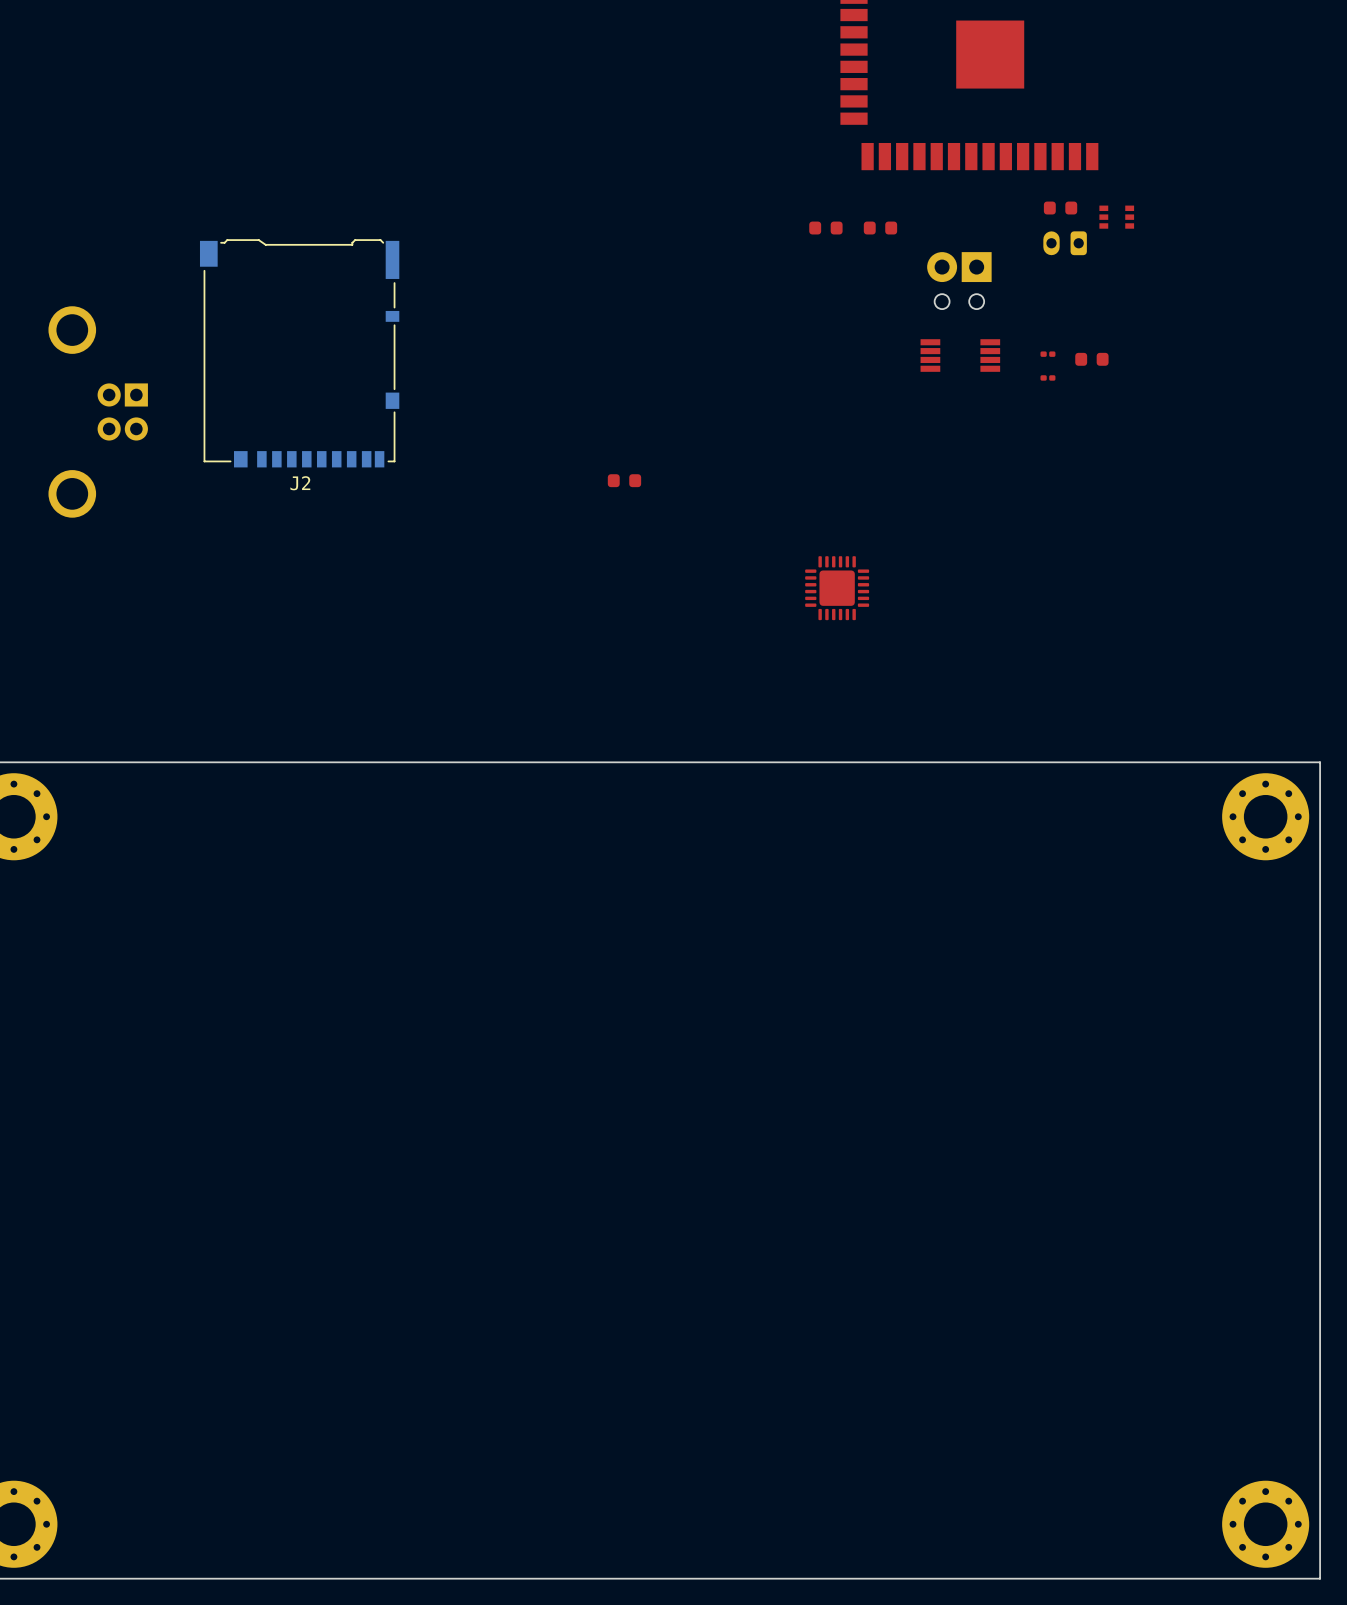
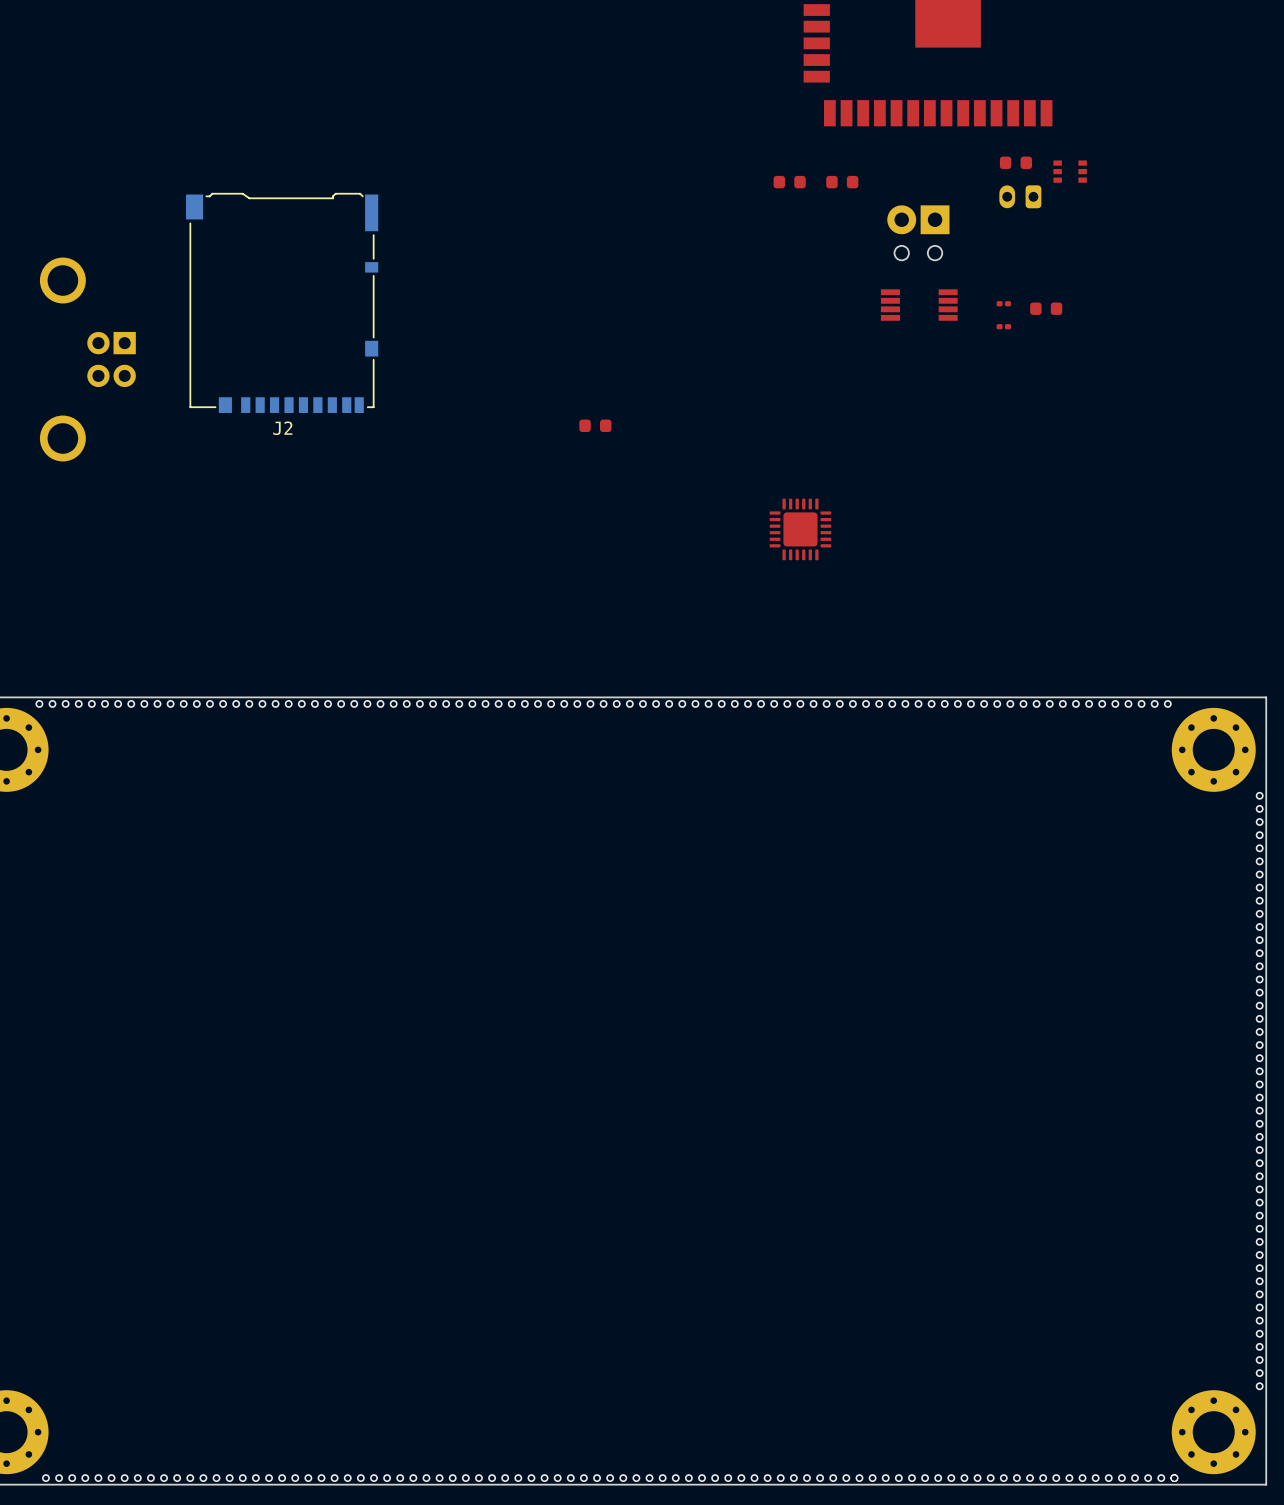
via: none -> (39, 703)
via: none -> (52, 703)
via: none -> (65, 703)
via: none -> (78, 703)
via: none -> (91, 703)
via: none -> (105, 703)
via: none -> (118, 703)
via: none -> (131, 703)
via: none -> (144, 703)
via: none -> (157, 703)
via: none -> (170, 703)
via: none -> (183, 703)
via: none -> (196, 703)
via: none -> (209, 703)
via: none -> (223, 703)
via: none -> (236, 703)
via: none -> (249, 703)
via: none -> (262, 703)
via: none -> (275, 703)
via: none -> (288, 703)
via: none -> (301, 703)
via: none -> (314, 703)
via: none -> (328, 703)
via: none -> (341, 703)
via: none -> (354, 703)
via: none -> (367, 703)
via: none -> (380, 703)
via: none -> (393, 703)
via: none -> (406, 703)
via: none -> (419, 703)
via: none -> (433, 703)
via: none -> (446, 703)
via: none -> (459, 703)
via: none -> (472, 703)
via: none -> (485, 703)
via: none -> (498, 703)
via: none -> (511, 703)
via: none -> (524, 703)
via: none -> (538, 703)
via: none -> (551, 703)
via: none -> (564, 703)
via: none -> (577, 703)
via: none -> (590, 703)
via: none -> (603, 703)
via: none -> (616, 703)
via: none -> (629, 703)
via: none -> (642, 703)
via: none -> (656, 703)
via: none -> (669, 703)
via: none -> (682, 703)
via: none -> (695, 703)
via: none -> (708, 703)
via: none -> (721, 703)
via: none -> (734, 703)
via: none -> (747, 703)
via: none -> (761, 703)
via: none -> (774, 703)
via: none -> (787, 703)
via: none -> (800, 703)
via: none -> (813, 703)
via: none -> (826, 703)
via: none -> (839, 703)
via: none -> (852, 703)
via: none -> (866, 703)
via: none -> (879, 703)
via: none -> (892, 703)
via: none -> (905, 703)
via: none -> (918, 703)
via: none -> (931, 703)
via: none -> (944, 703)
via: none -> (957, 703)
via: none -> (971, 703)
via: none -> (984, 703)
via: none -> (997, 703)
via: none -> (1010, 703)
via: none -> (1023, 703)
via: none -> (1036, 703)
via: none -> (1049, 703)
via: none -> (1062, 703)
via: none -> (1075, 703)
via: none -> (1089, 703)
via: none -> (1102, 703)
via: none -> (1115, 703)
via: none -> (1128, 703)
via: none -> (1141, 703)
via: none -> (1154, 703)
via: none -> (1167, 703)
via: none -> (1259, 795)
via: none -> (1259, 808)
via: none -> (1259, 822)
via: none -> (1259, 835)
via: none -> (1259, 848)
via: none -> (1259, 861)
via: none -> (1259, 874)
via: none -> (1259, 887)
via: none -> (1259, 900)
via: none -> (1259, 913)
via: none -> (1259, 927)
via: none -> (1259, 940)
via: none -> (1259, 953)
via: none -> (1259, 966)
via: none -> (1259, 979)
via: none -> (1259, 992)
via: none -> (1259, 1005)
via: none -> (1259, 1018)
via: none -> (1259, 1031)
via: none -> (1259, 1045)
via: none -> (1259, 1058)
via: none -> (1259, 1071)
via: none -> (1259, 1084)
via: none -> (1259, 1097)
via: none -> (1259, 1110)
via: none -> (1259, 1123)
via: none -> (1259, 1136)
via: none -> (1259, 1150)
via: none -> (1259, 1163)
via: none -> (1259, 1176)
via: none -> (1259, 1189)
via: none -> (1259, 1202)
via: none -> (1259, 1215)
via: none -> (1259, 1228)
via: none -> (1259, 1241)
via: none -> (1259, 1255)
via: none -> (1259, 1268)
via: none -> (1259, 1281)
via: none -> (1259, 1294)
via: none -> (1259, 1307)
via: none -> (1259, 1320)
via: none -> (1259, 1333)
via: none -> (1259, 1346)
via: none -> (1259, 1360)
via: none -> (1259, 1373)
via: none -> (1259, 1386)
via: none -> (45, 1478)
via: none -> (59, 1478)
via: none -> (72, 1478)
via: none -> (85, 1478)
via: none -> (98, 1478)
via: none -> (111, 1478)
via: none -> (124, 1478)
via: none -> (137, 1478)
via: none -> (150, 1478)
via: none -> (164, 1478)
via: none -> (177, 1478)
via: none -> (190, 1478)
via: none -> (203, 1478)
via: none -> (216, 1478)
via: none -> (229, 1478)
via: none -> (242, 1478)
via: none -> (255, 1478)
via: none -> (269, 1478)
via: none -> (282, 1478)
via: none -> (295, 1478)
via: none -> (308, 1478)
via: none -> (321, 1478)
via: none -> (334, 1478)
via: none -> (347, 1478)
via: none -> (360, 1478)
via: none -> (373, 1478)
via: none -> (387, 1478)
via: none -> (400, 1478)
via: none -> (413, 1478)
via: none -> (426, 1478)
via: none -> (439, 1478)
via: none -> (452, 1478)
via: none -> (465, 1478)
via: none -> (478, 1478)
via: none -> (492, 1478)
via: none -> (505, 1478)
via: none -> (518, 1478)
via: none -> (531, 1478)
via: none -> (544, 1478)
via: none -> (557, 1478)
via: none -> (570, 1478)
via: none -> (583, 1478)
via: none -> (597, 1478)
via: none -> (610, 1478)
via: none -> (623, 1478)
via: none -> (636, 1478)
via: none -> (649, 1478)
via: none -> (662, 1478)
via: none -> (675, 1478)
via: none -> (688, 1478)
via: none -> (702, 1478)
via: none -> (715, 1478)
via: none -> (728, 1478)
via: none -> (741, 1478)
via: none -> (754, 1478)
via: none -> (767, 1478)
via: none -> (780, 1478)
via: none -> (793, 1478)
via: none -> (806, 1478)
via: none -> (820, 1478)
via: none -> (833, 1478)
via: none -> (846, 1478)
via: none -> (859, 1478)
via: none -> (872, 1478)
via: none -> (885, 1478)
via: none -> (898, 1478)
via: none -> (911, 1478)
via: none -> (925, 1478)
via: none -> (938, 1478)
via: none -> (951, 1478)
via: none -> (964, 1478)
via: none -> (977, 1478)
via: none -> (990, 1478)
via: none -> (1003, 1478)
via: none -> (1016, 1478)
via: none -> (1030, 1478)
via: none -> (1043, 1478)
via: none -> (1056, 1478)
via: none -> (1069, 1478)
via: none -> (1082, 1478)
via: none -> (1095, 1478)
via: none -> (1108, 1478)
via: none -> (1121, 1478)
via: none -> (1135, 1478)
via: none -> (1148, 1478)
via: none -> (1161, 1478)
via: none -> (1174, 1478)

